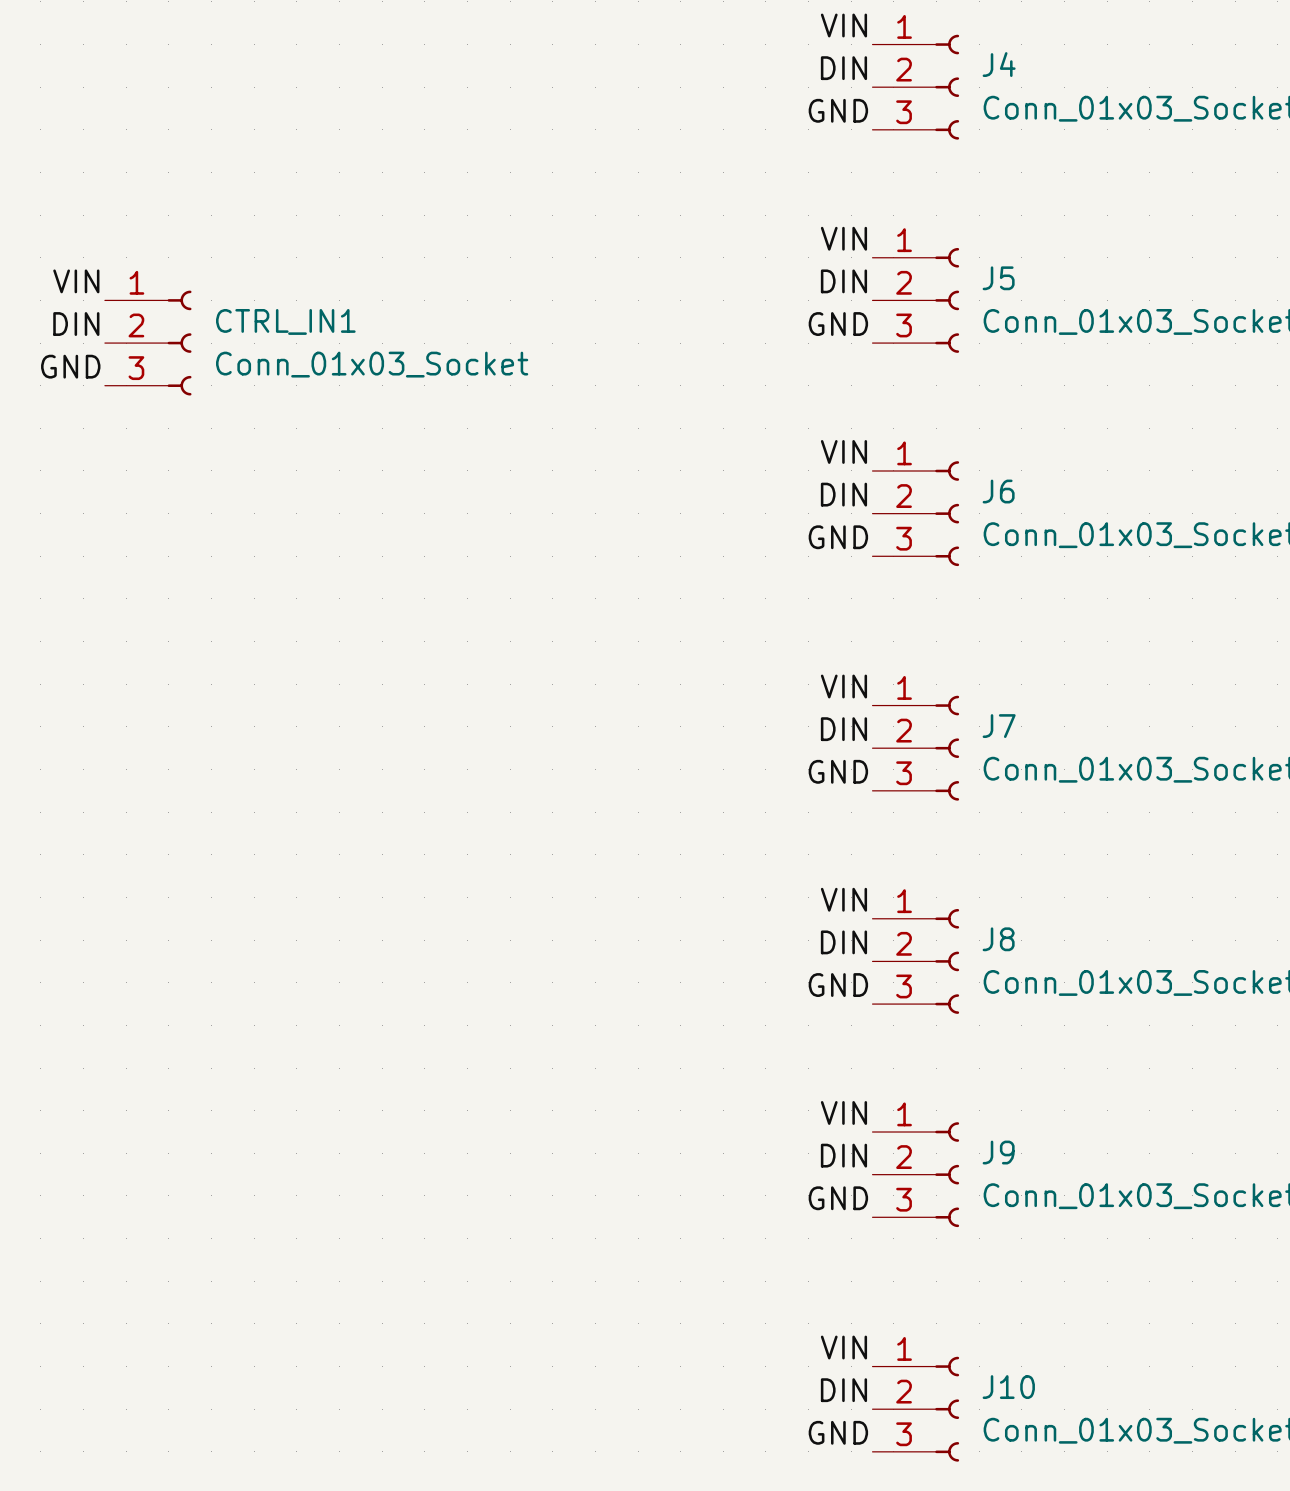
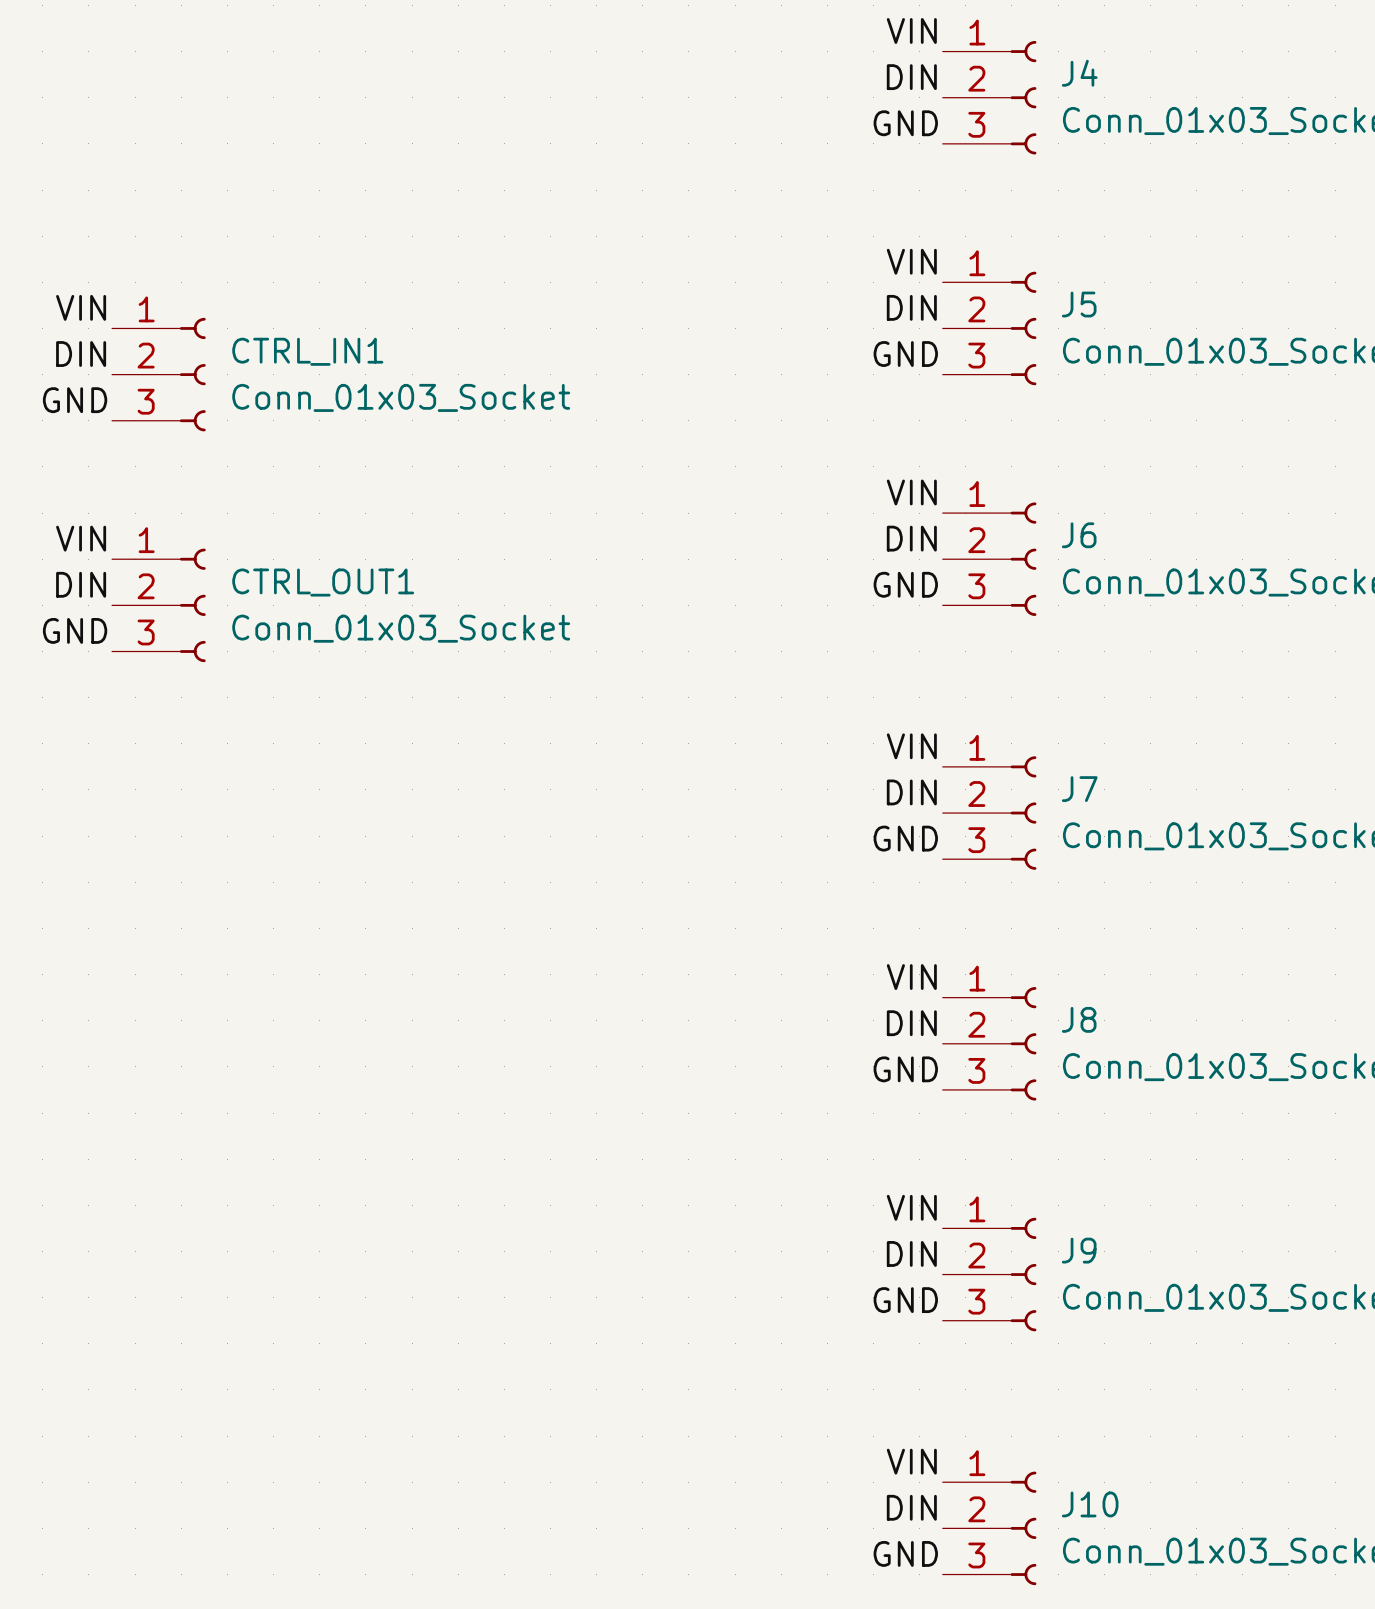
label: none -> VIN (81, 538)
label: none -> DIN (81, 584)
CTRL_OUT1: none -> Conn_01x03_Socket (158, 605)
label: none -> GND (75, 630)

